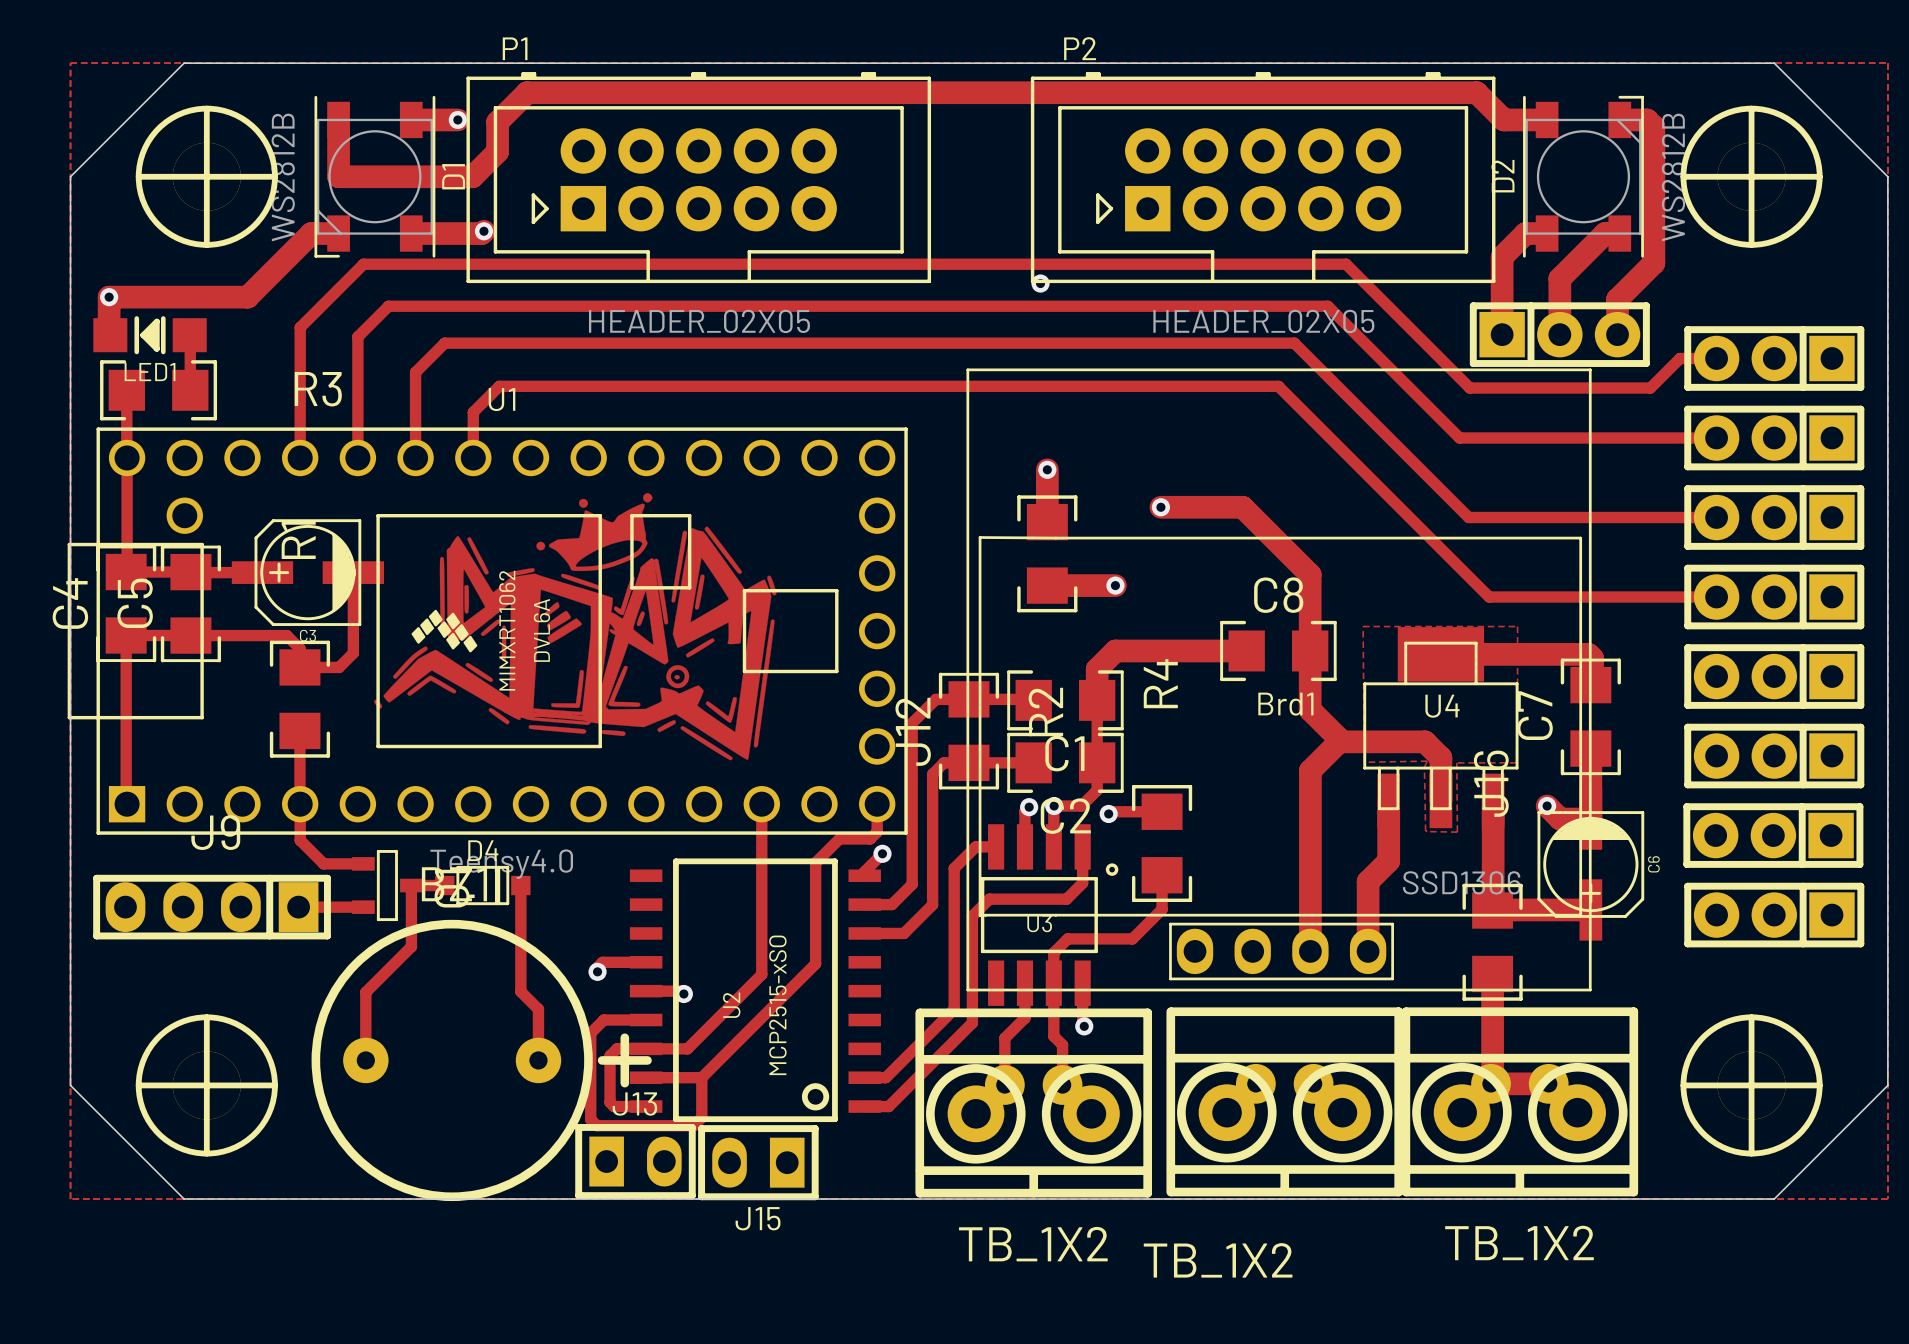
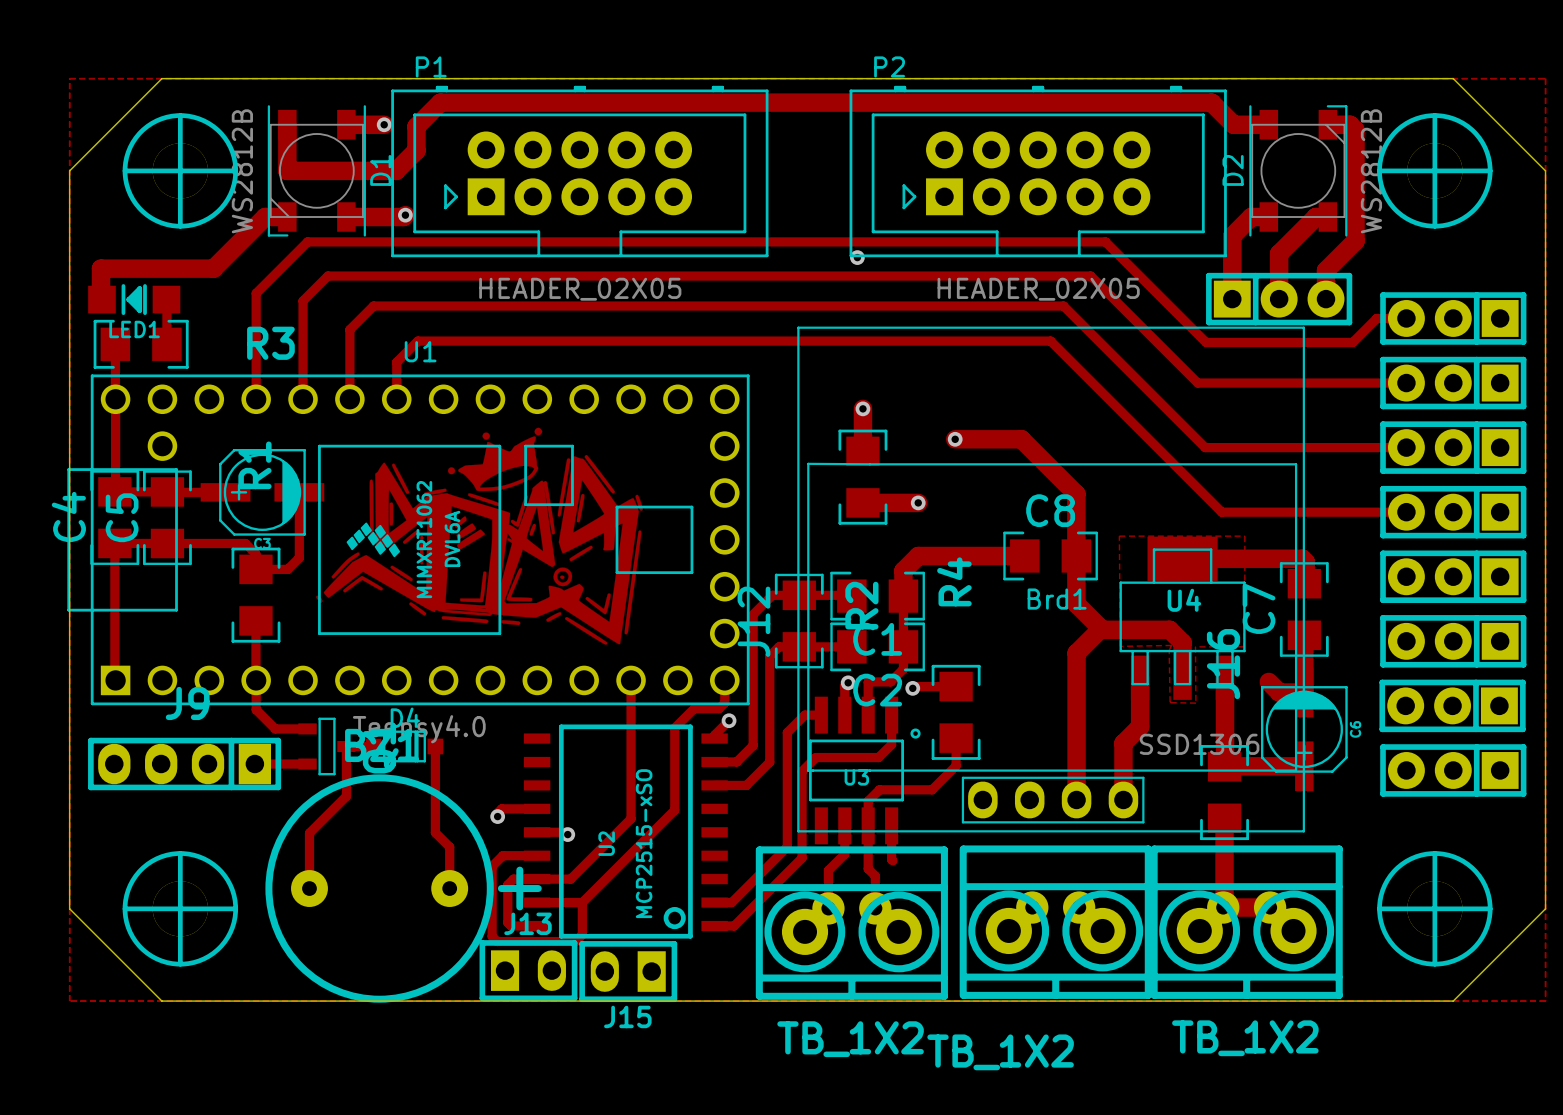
via: (109, 297) -> none
via: (1054, 806) -> none
via: (1547, 806) -> none
via: (1084, 1026) -> none

